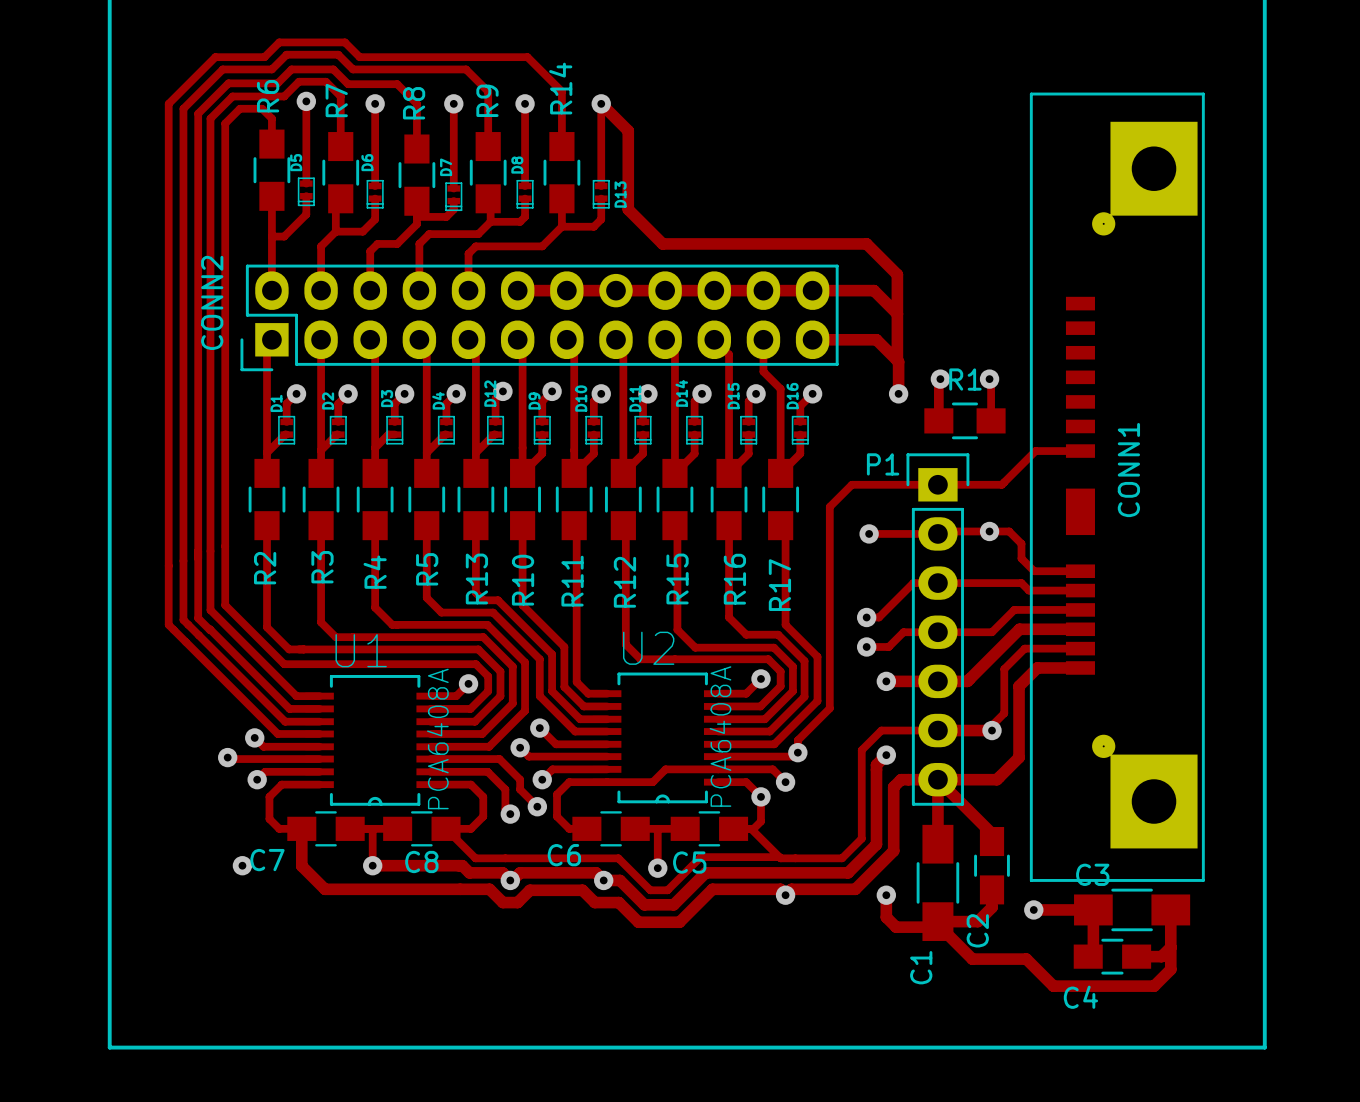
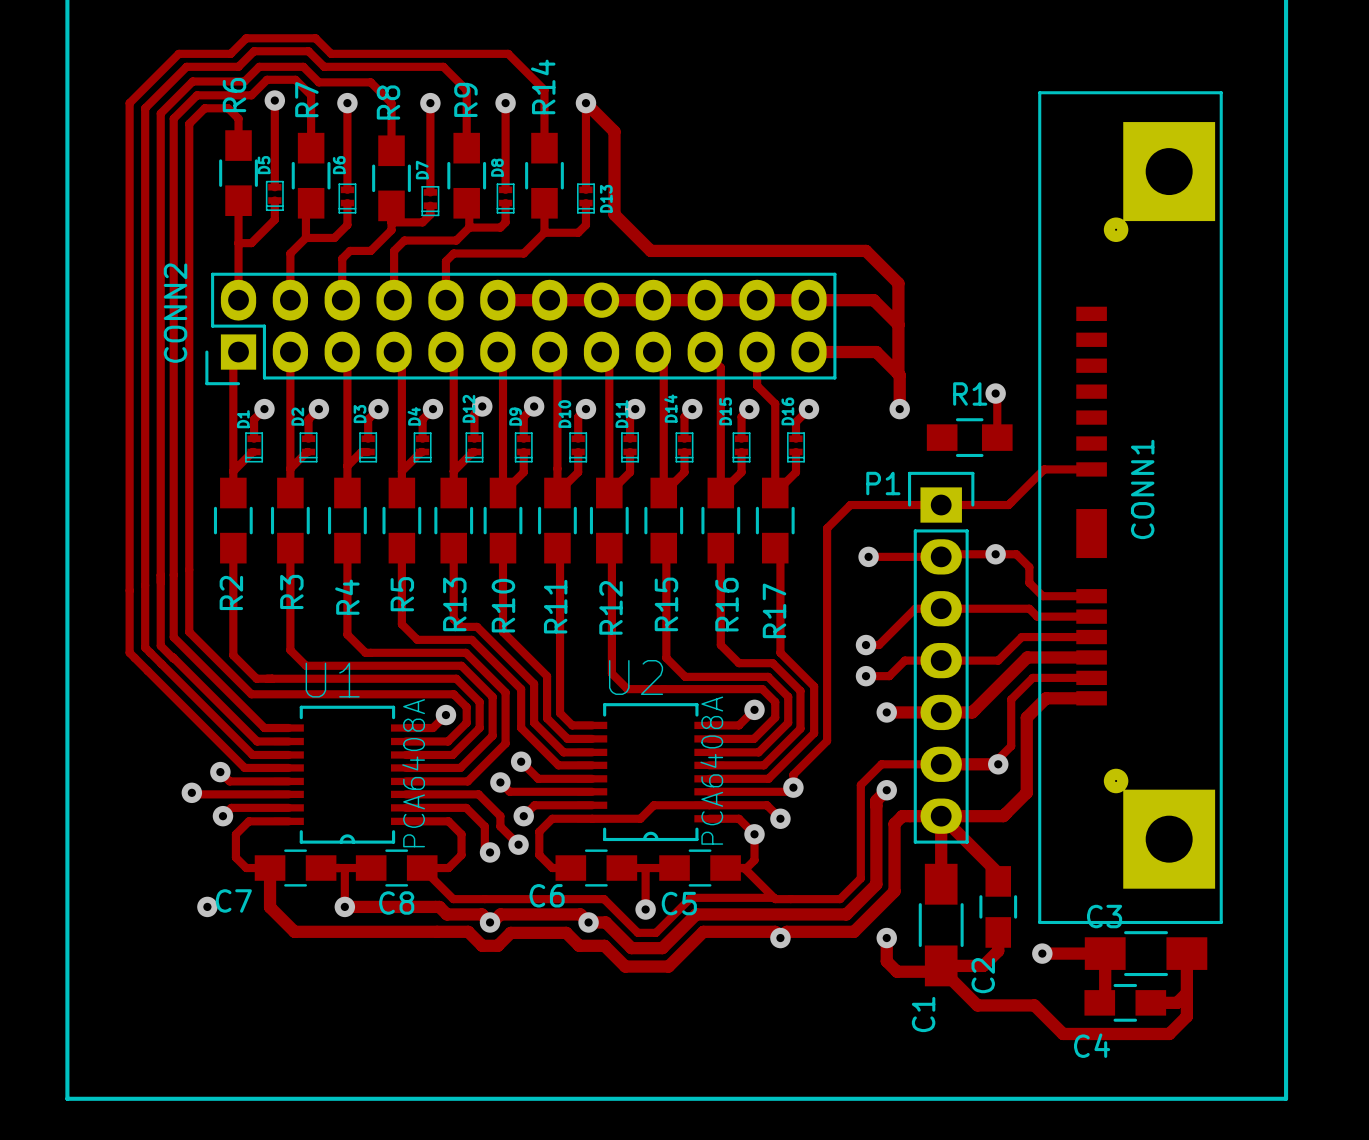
track: (940, 379) (938, 420) -> none
via: (940, 379) -> none

